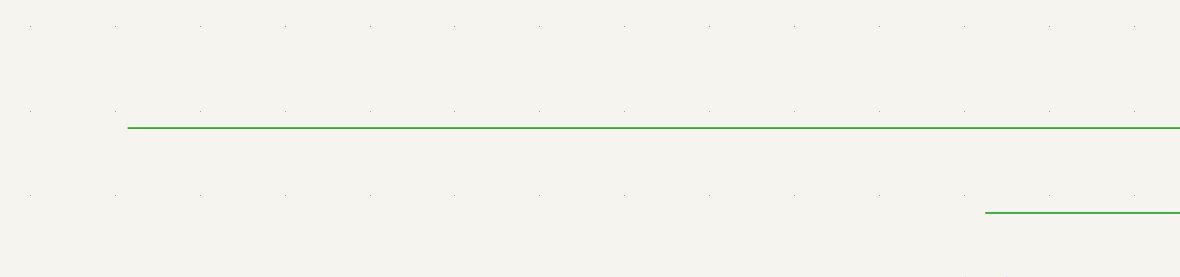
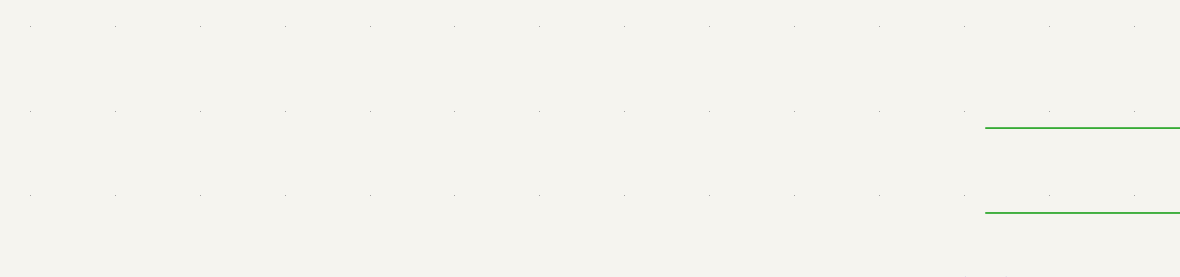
wire: (128, 128) (985, 128) -> none

